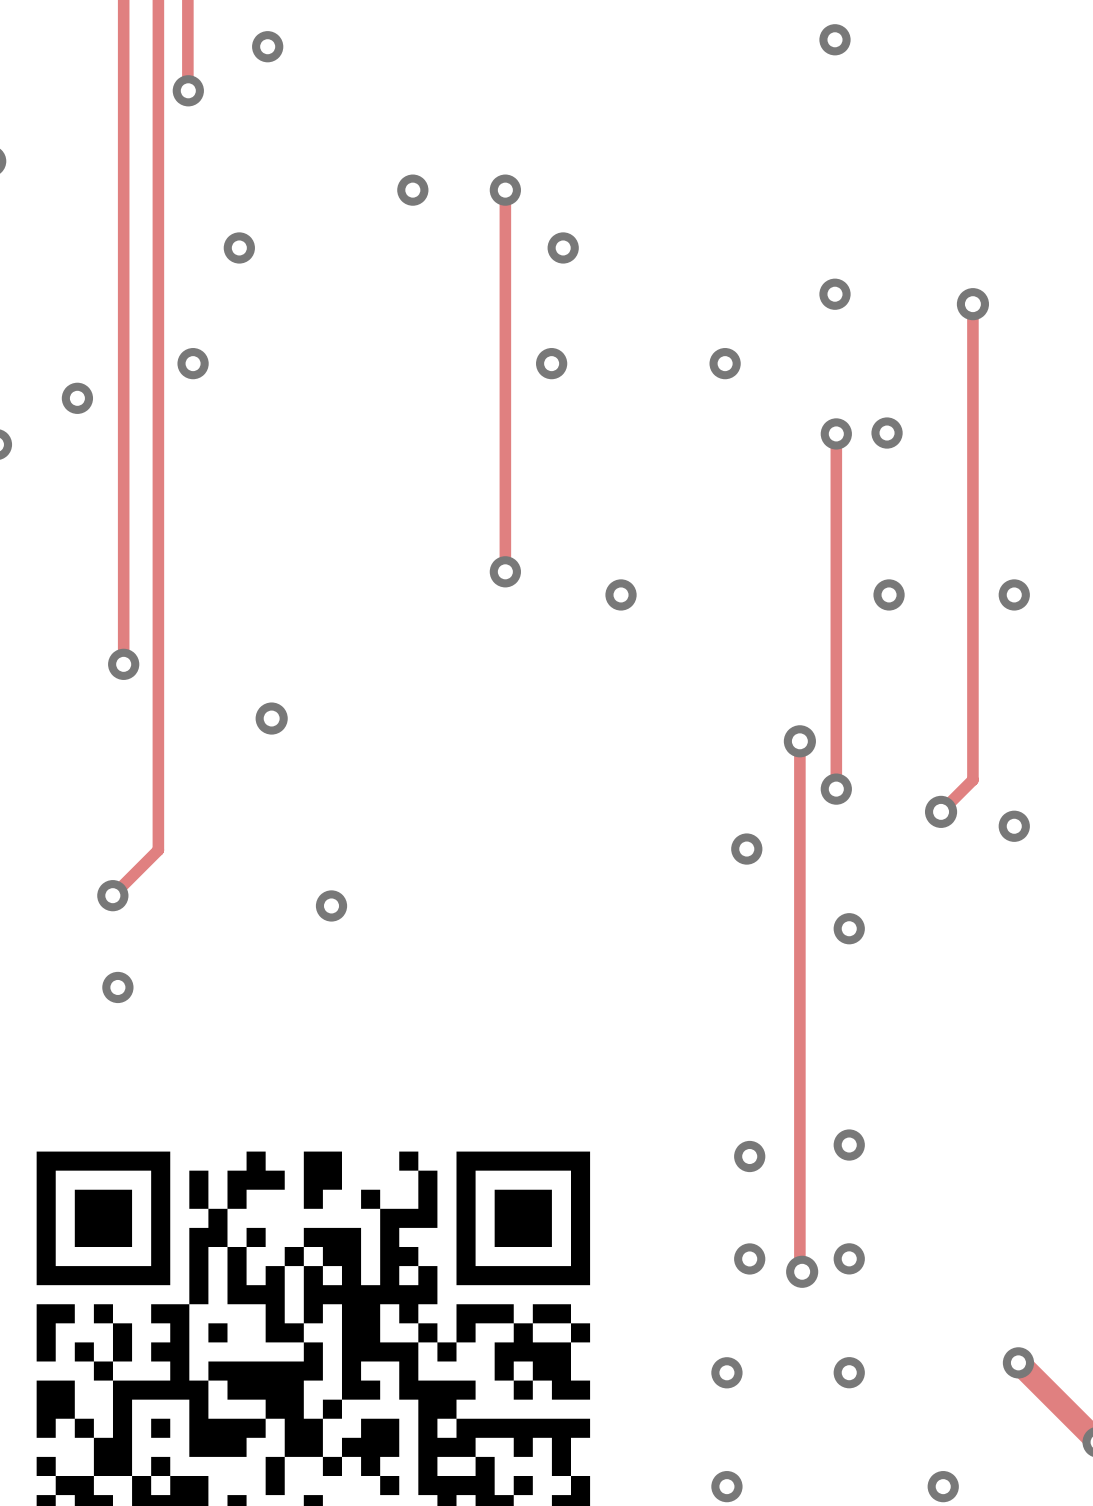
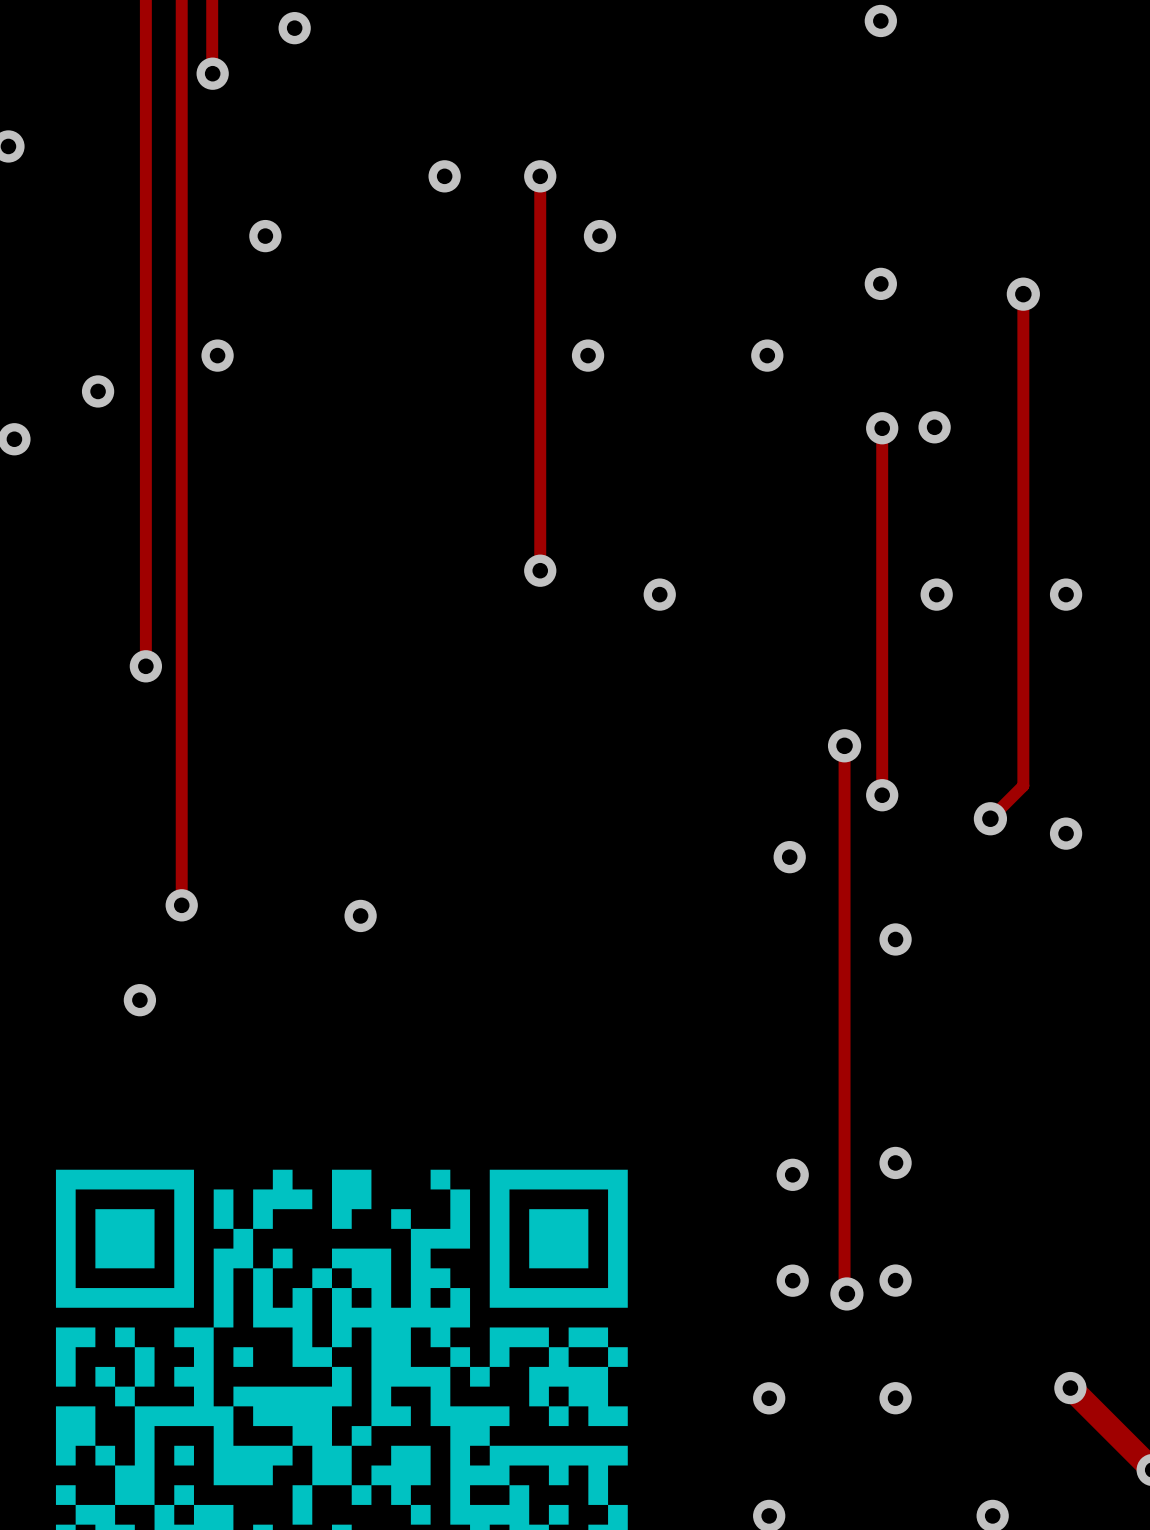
via: (271, 718) -> none
track: (158, 850) (112, 895) -> (181, 858) (181, 905)
via position: (112, 895) -> (181, 905)

